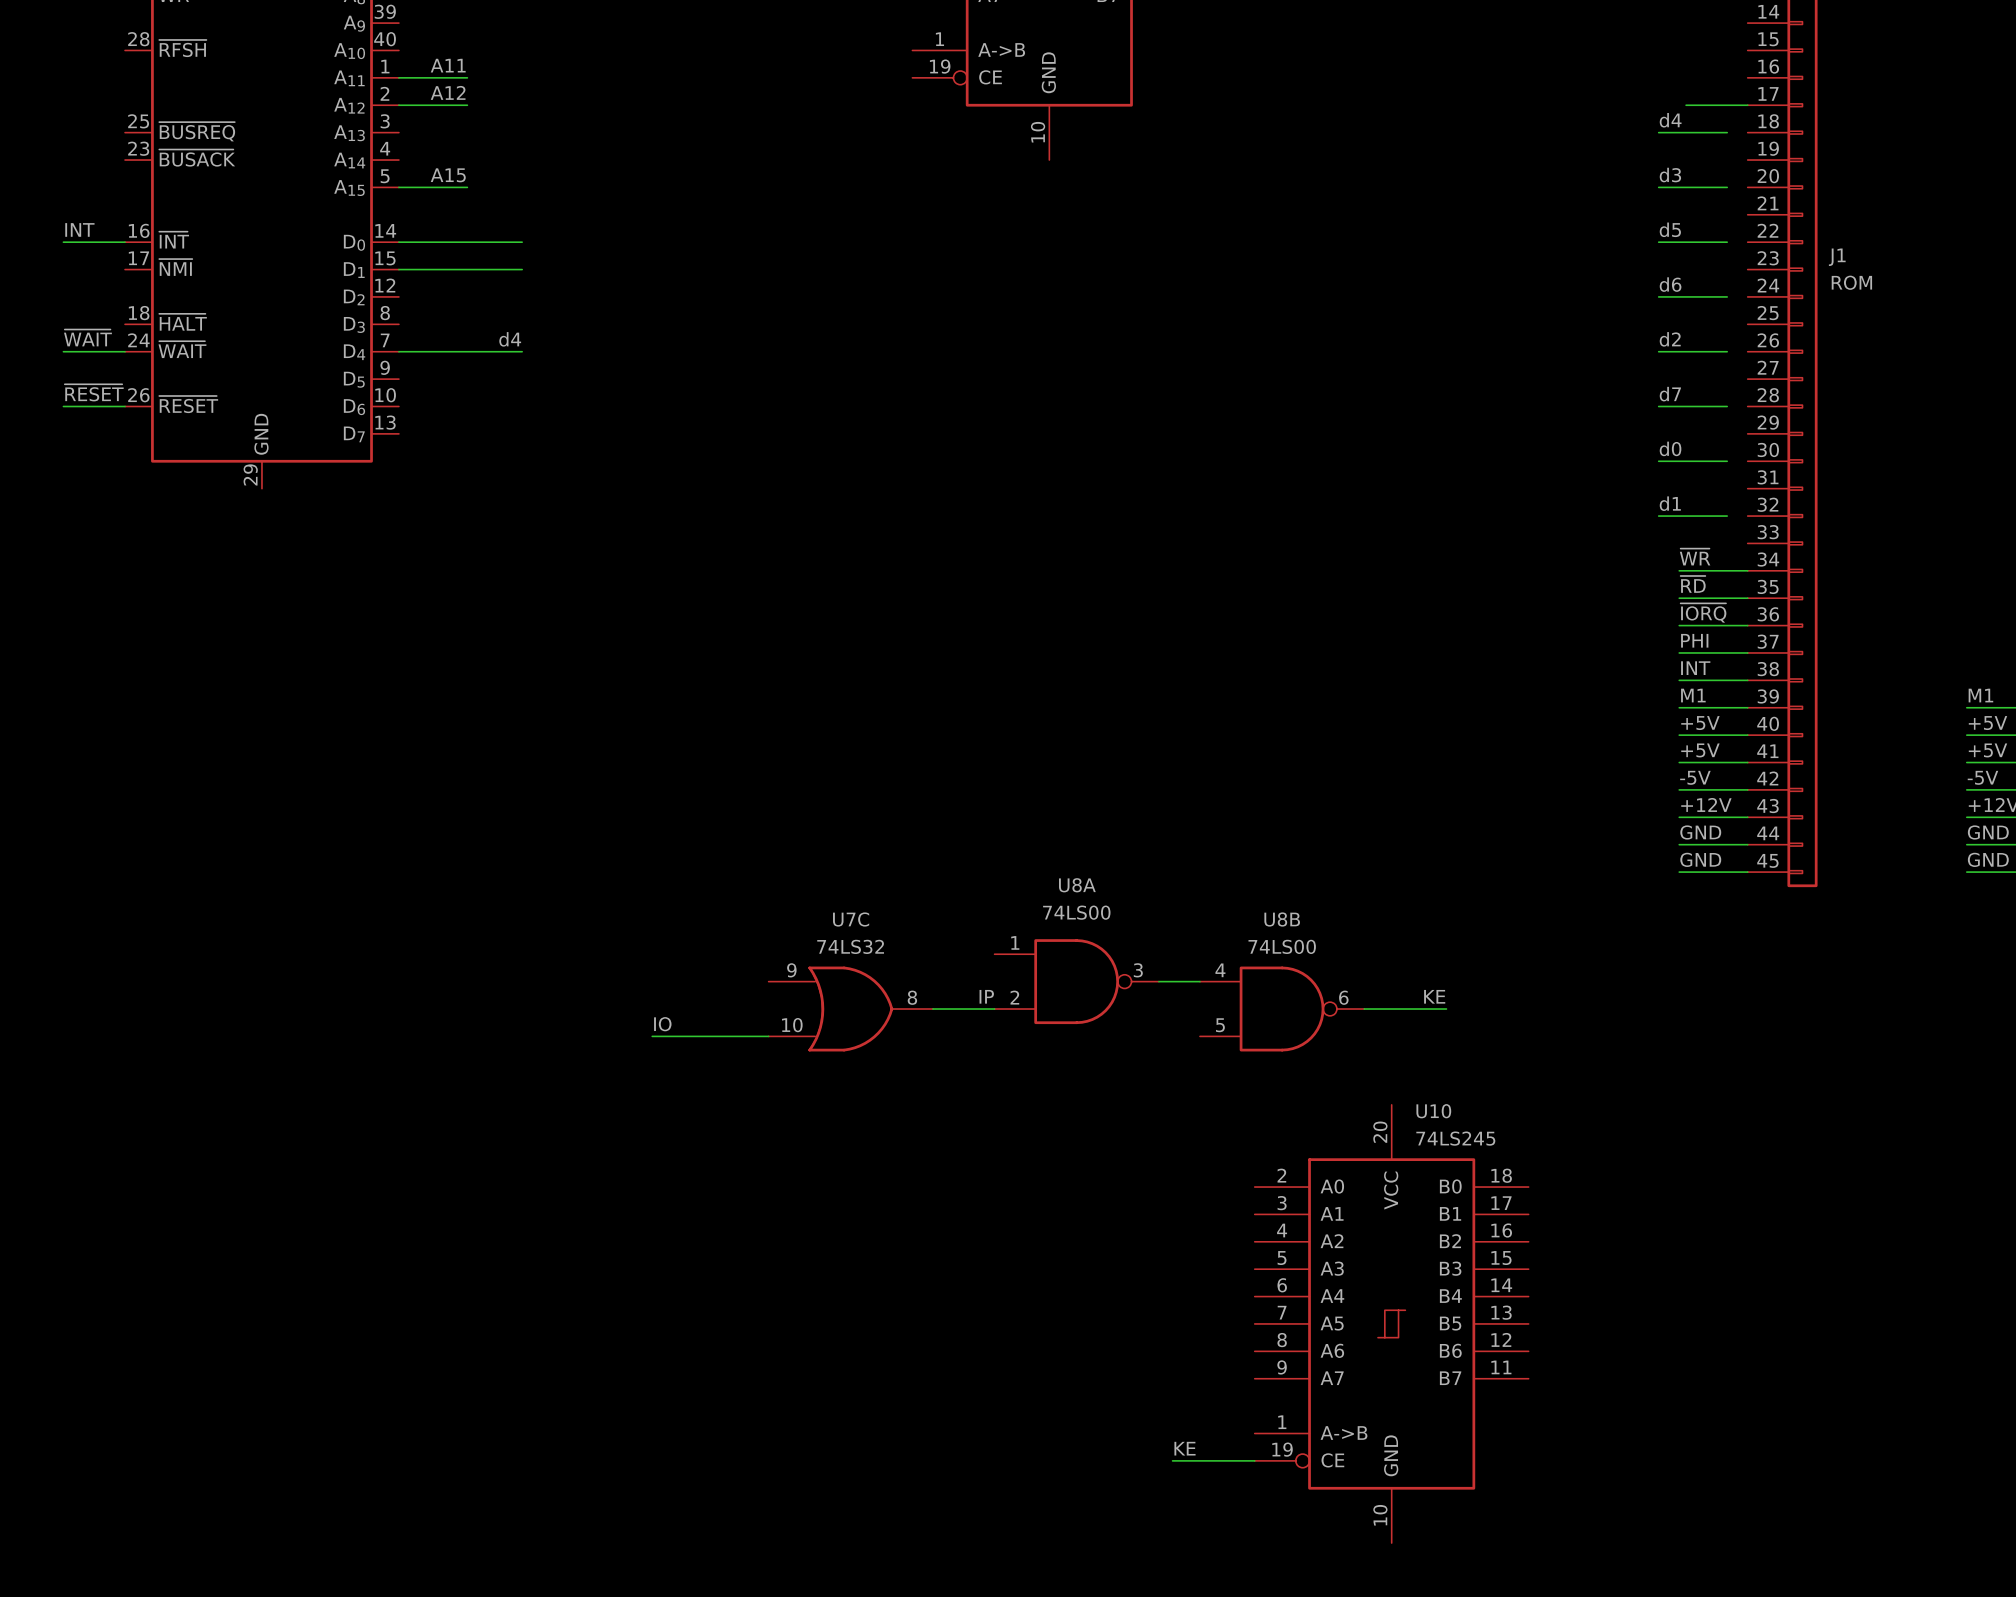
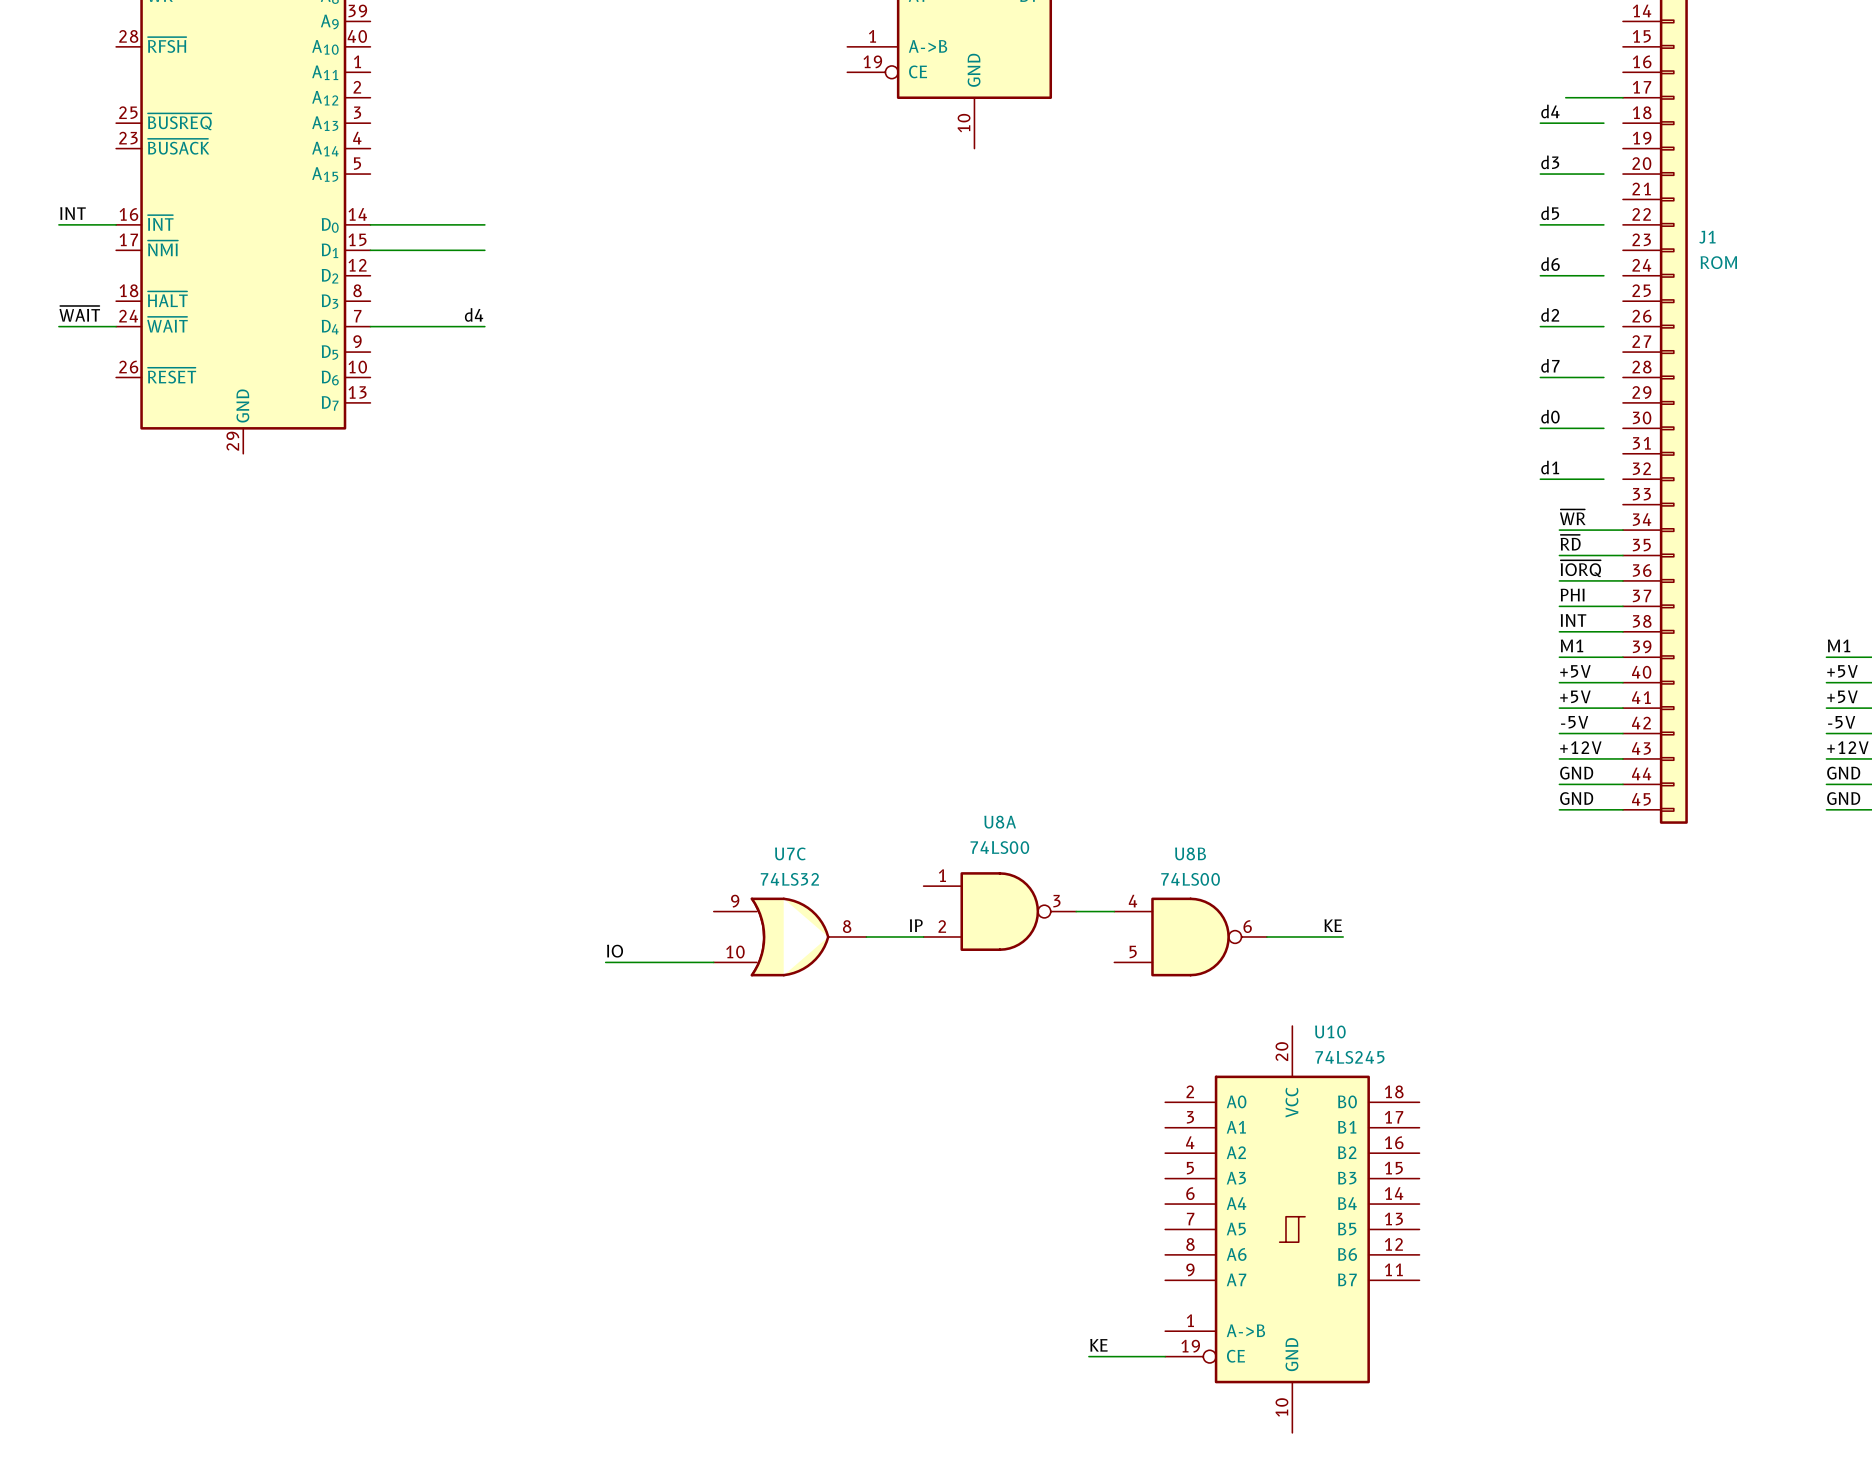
label: A11 (448, 65) -> none
wire: (398, 77) (467, 77) -> none
label: A12 (448, 92) -> none
wire: (398, 105) (467, 105) -> none
label: A15 (448, 175) -> none
wire: (398, 187) (467, 187) -> none
label: ~{RESET} (94, 392) -> none
wire: (63, 406) (125, 406) -> none

